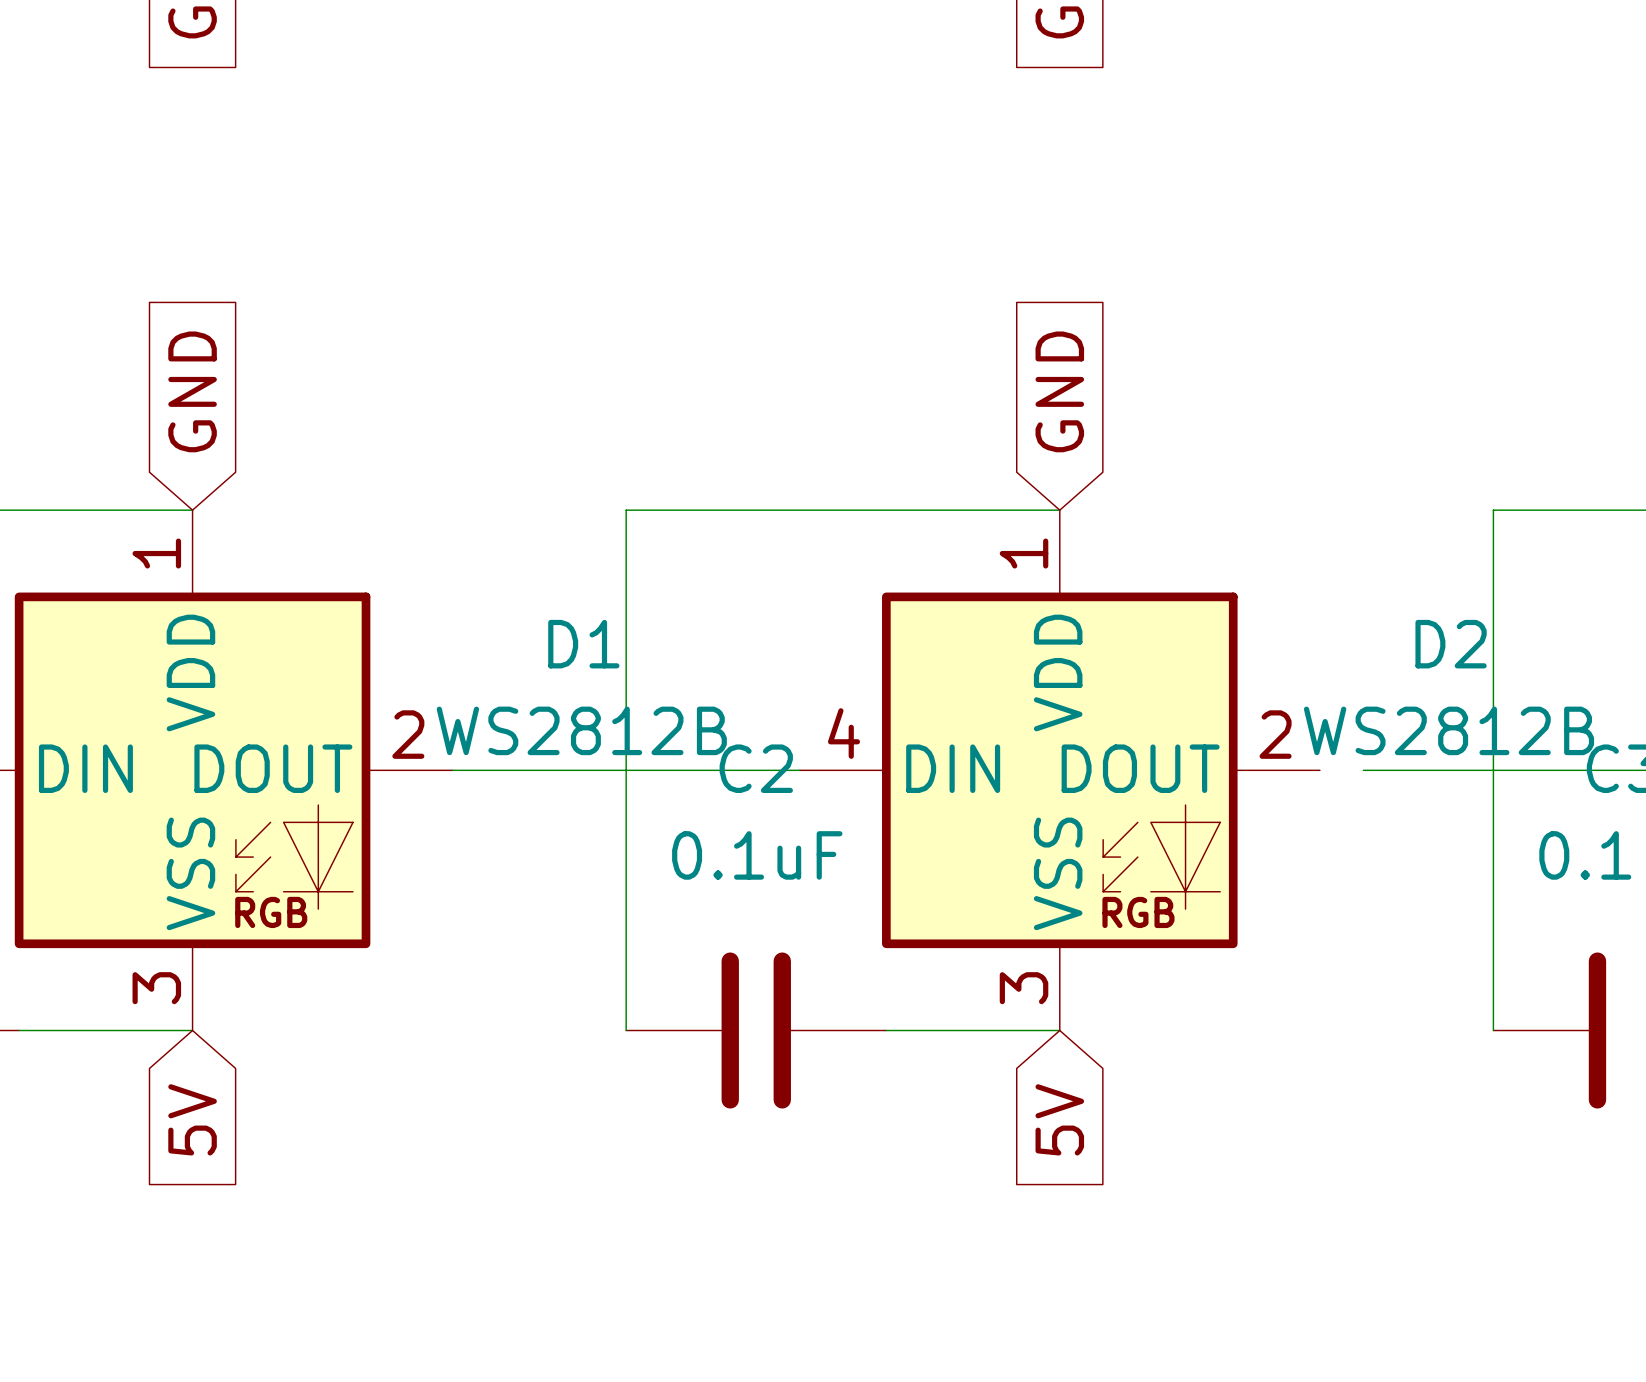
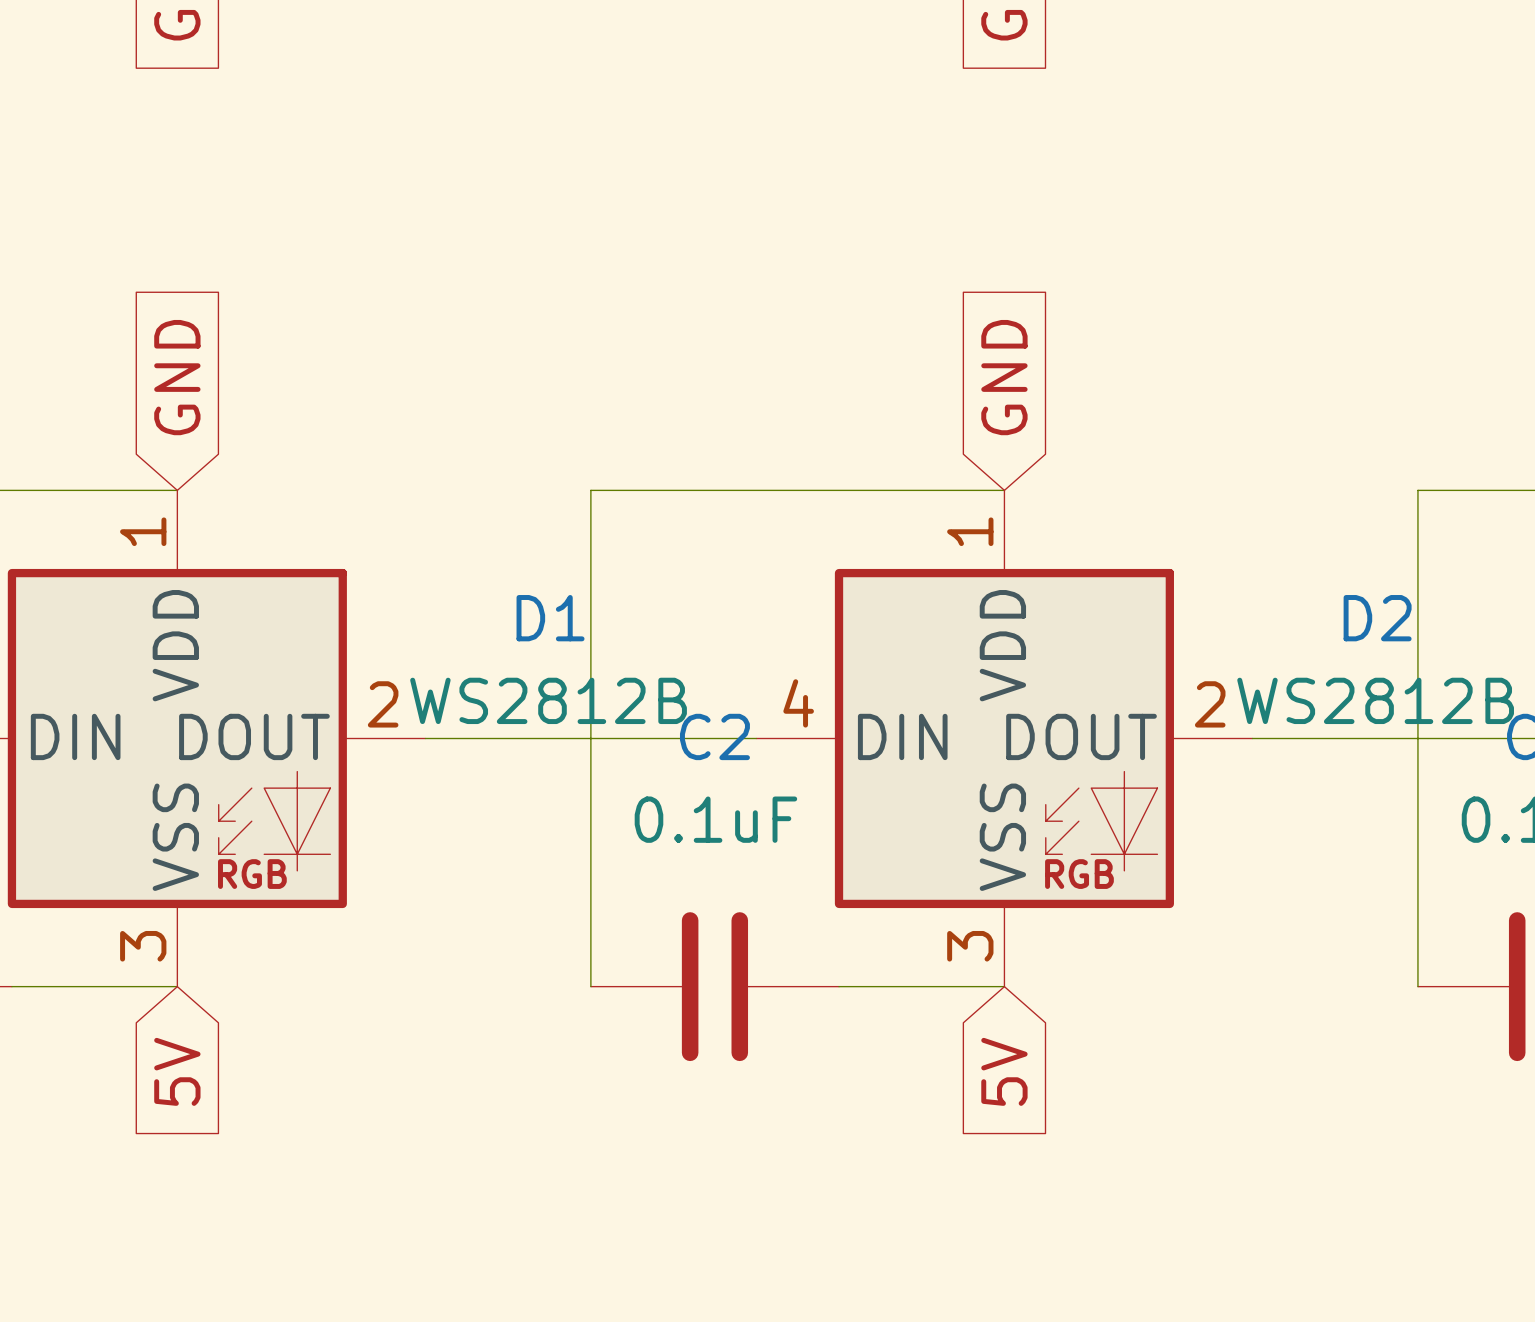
wire: none -> (1252, 738) (1293, 738)

